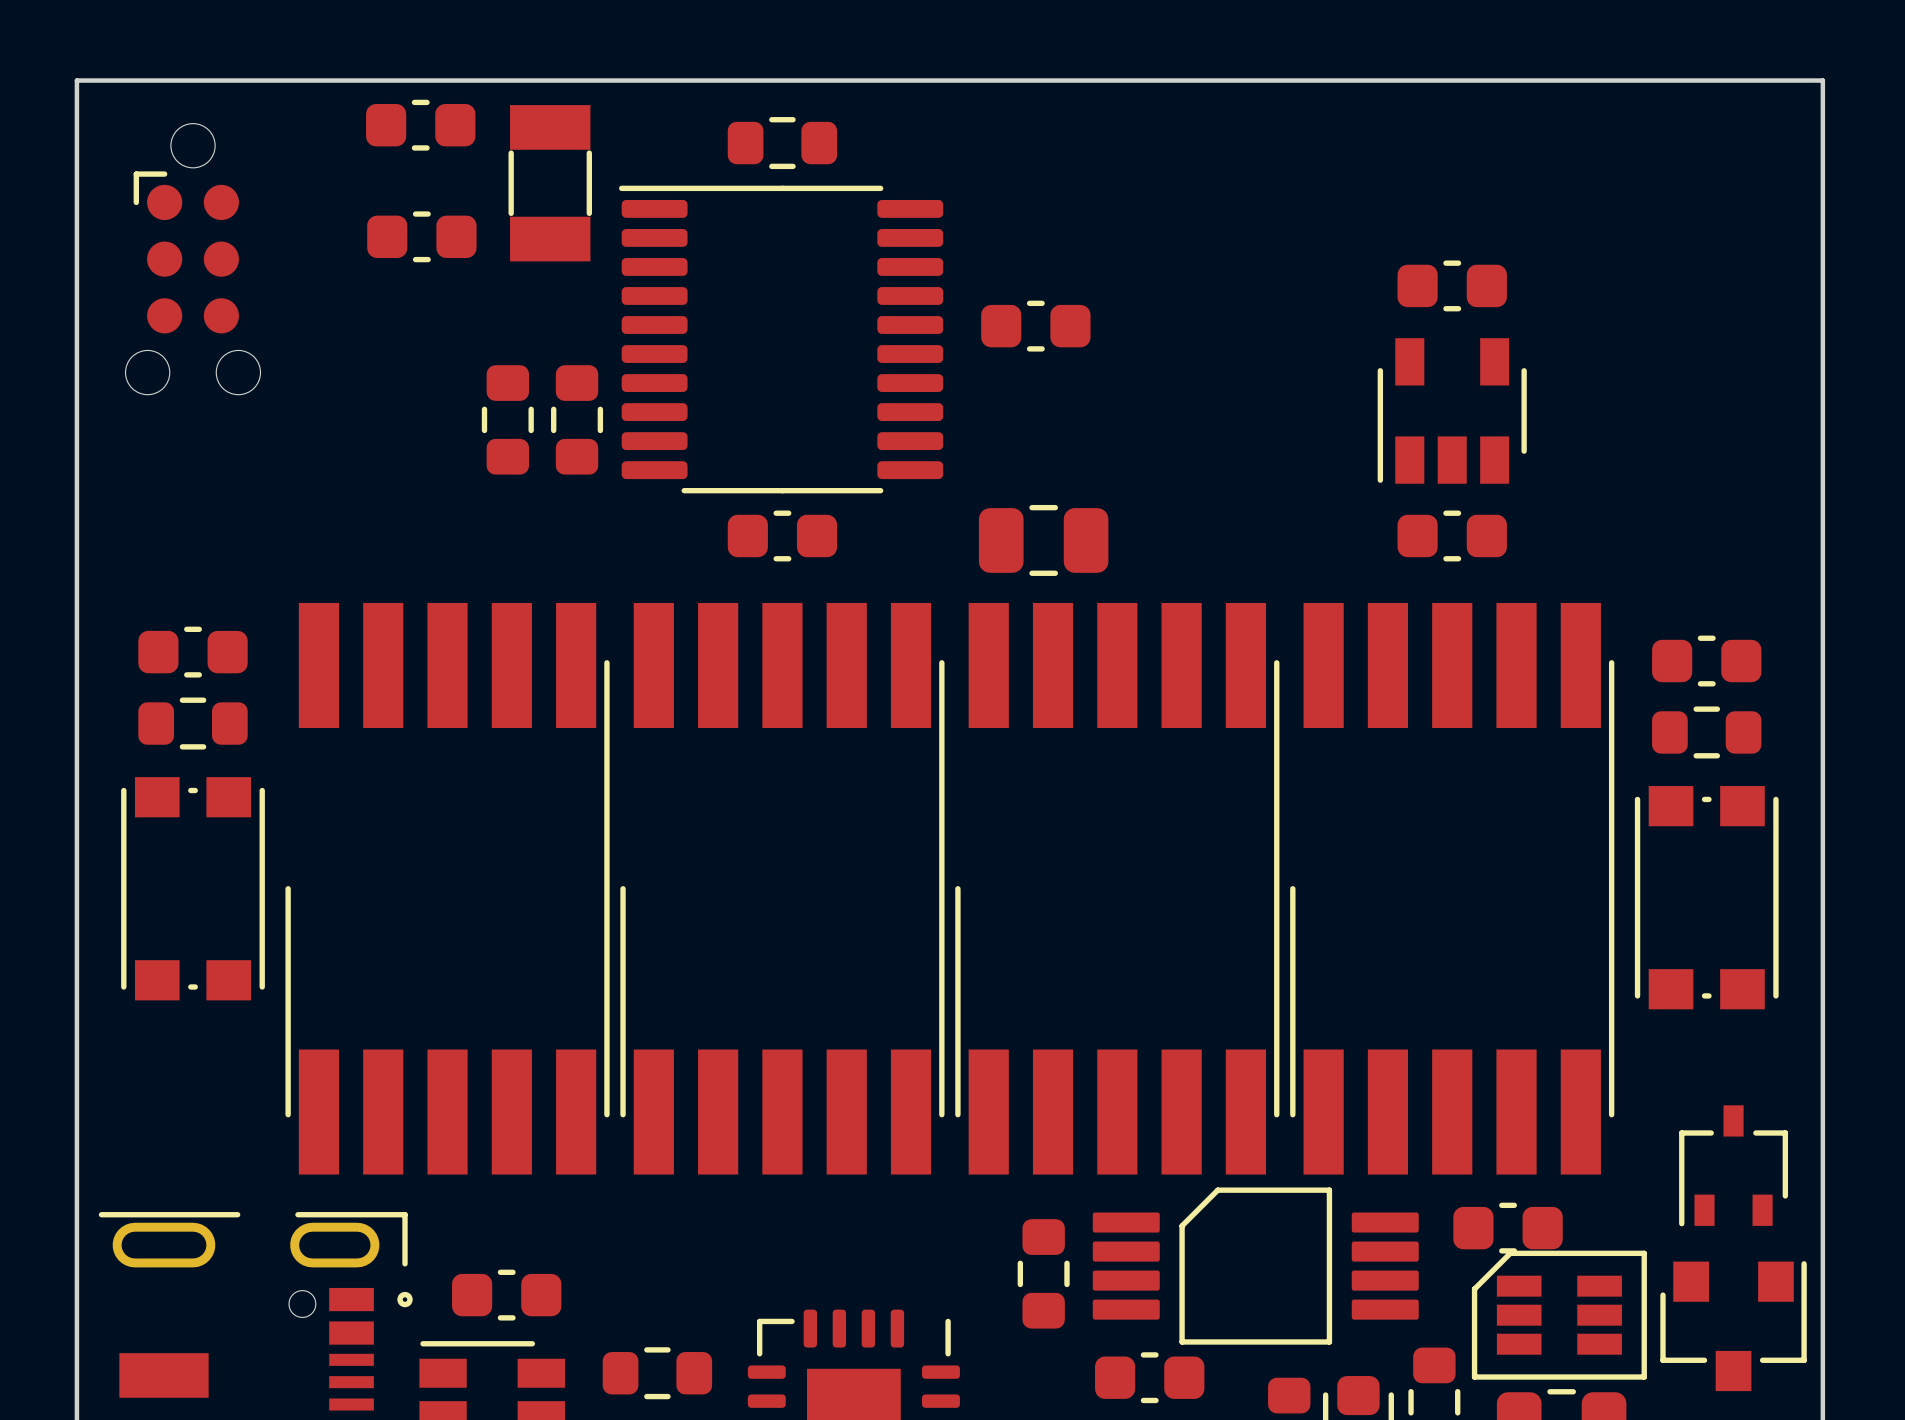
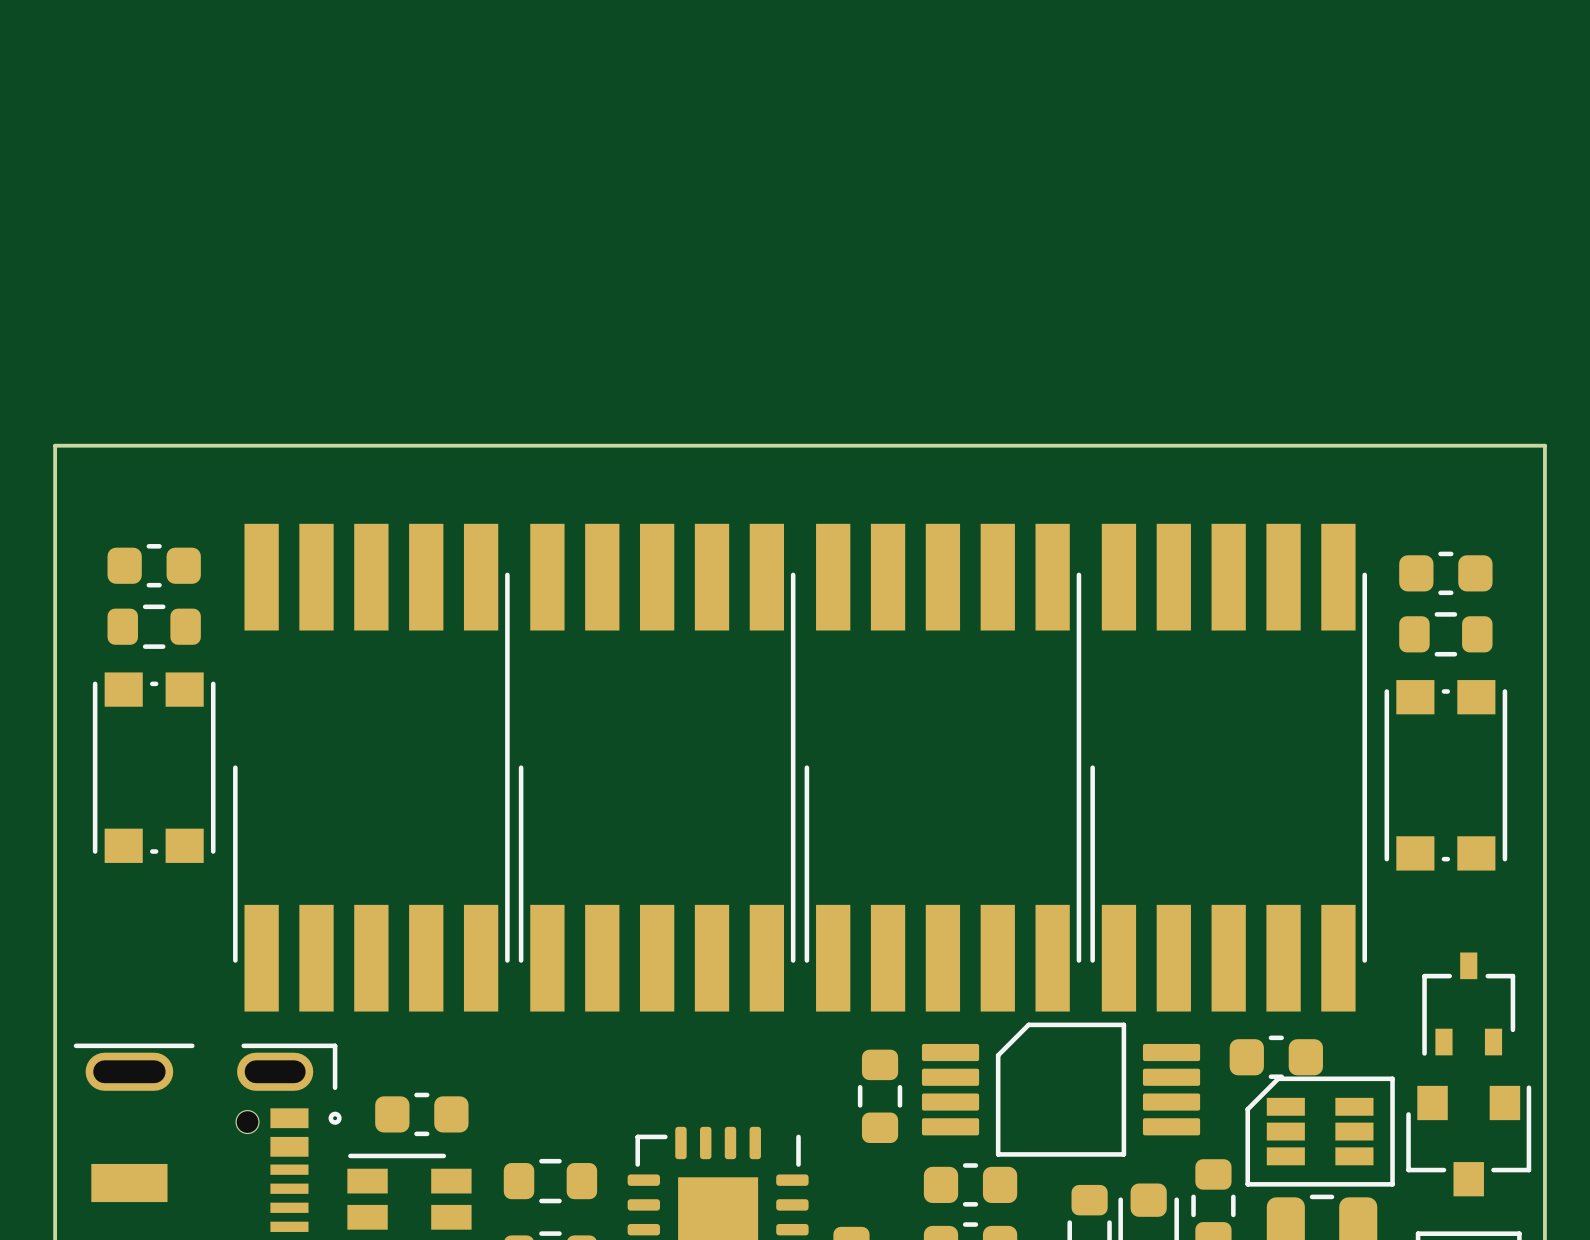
part: (420, 125) -> none
part: (782, 143) -> none
part: (550, 183) -> none
part: (421, 236) -> none
part: (193, 259) -> none
part: (1452, 285) -> none
part: (1035, 326) -> none
part: (781, 339) -> none
part: (1452, 410) -> none
part: (507, 419) -> none
part: (577, 419) -> none
board edge: (76, 511) (76, 80) (1822, 80) (1822, 511) -> (55, 445) (1544, 445)
part: (782, 535) -> none
part: (1452, 535) -> none
part: (1043, 540) -> none

